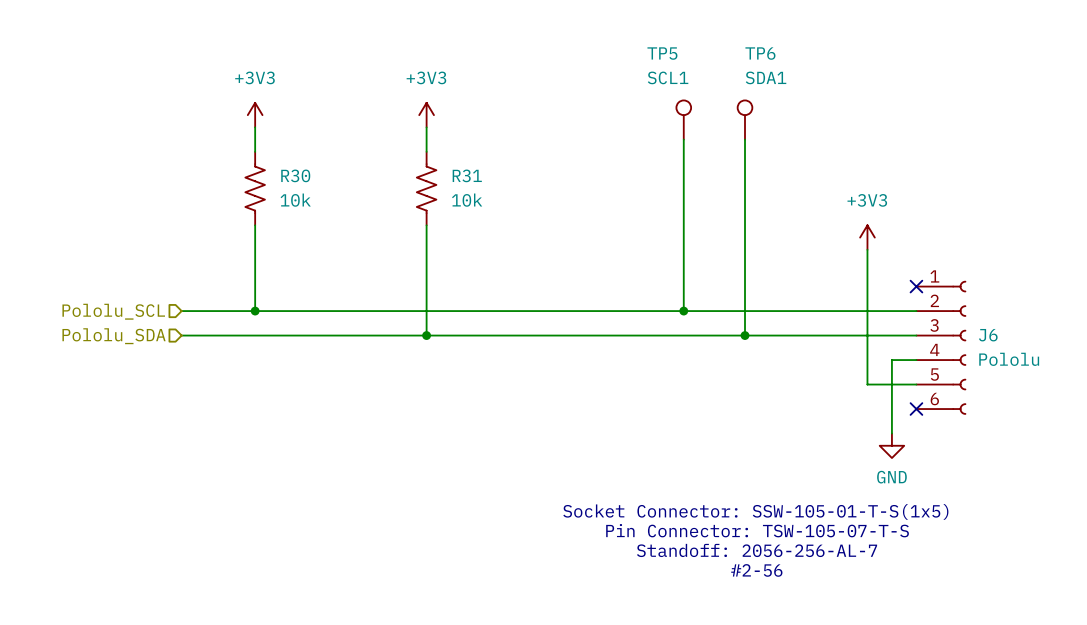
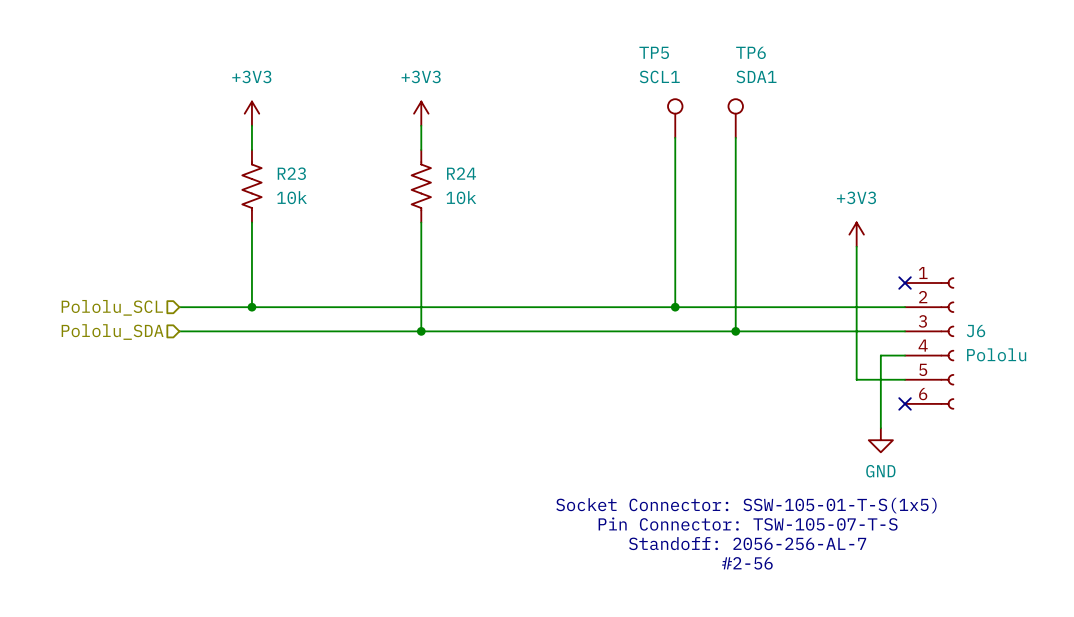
R30 name: R30 (295, 175) -> R23 (291, 173)
R31 name: R31 (467, 175) -> R24 (461, 173)

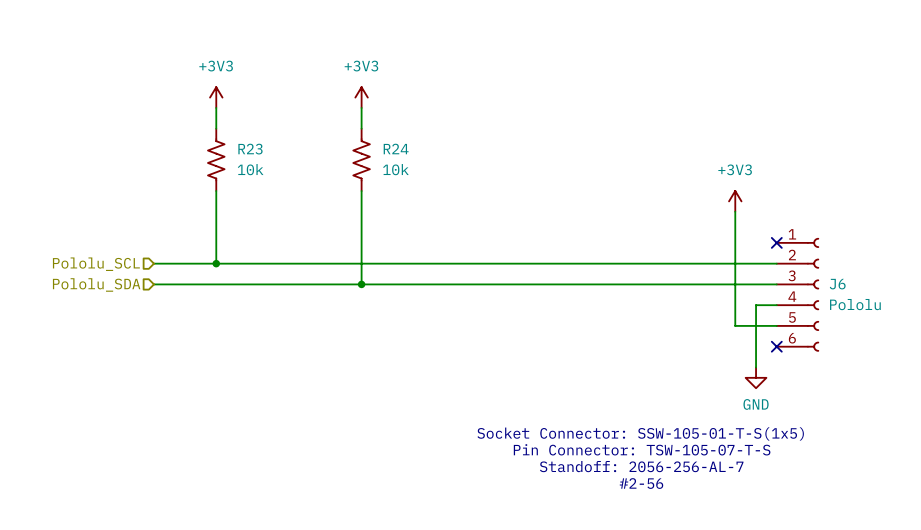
TP5: SCL1 (675, 118) -> none
TP6: SDA1 (735, 118) -> none
wire: (675, 137) (675, 307) -> none
wire: (735, 137) (735, 331) -> none
junction: (675, 307) -> none
junction: (735, 331) -> none

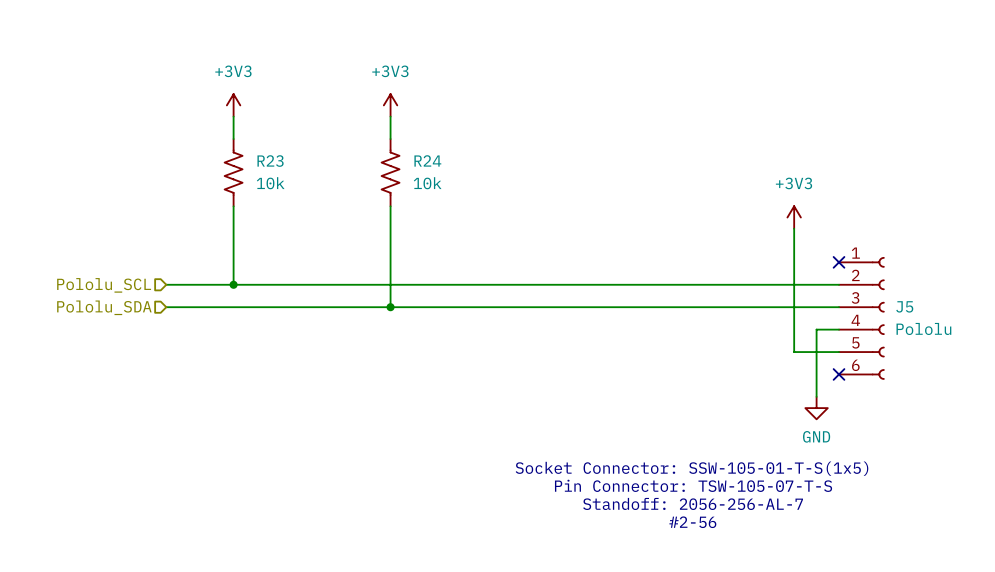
J6 name: J6 (837, 284) -> J5 (904, 306)

